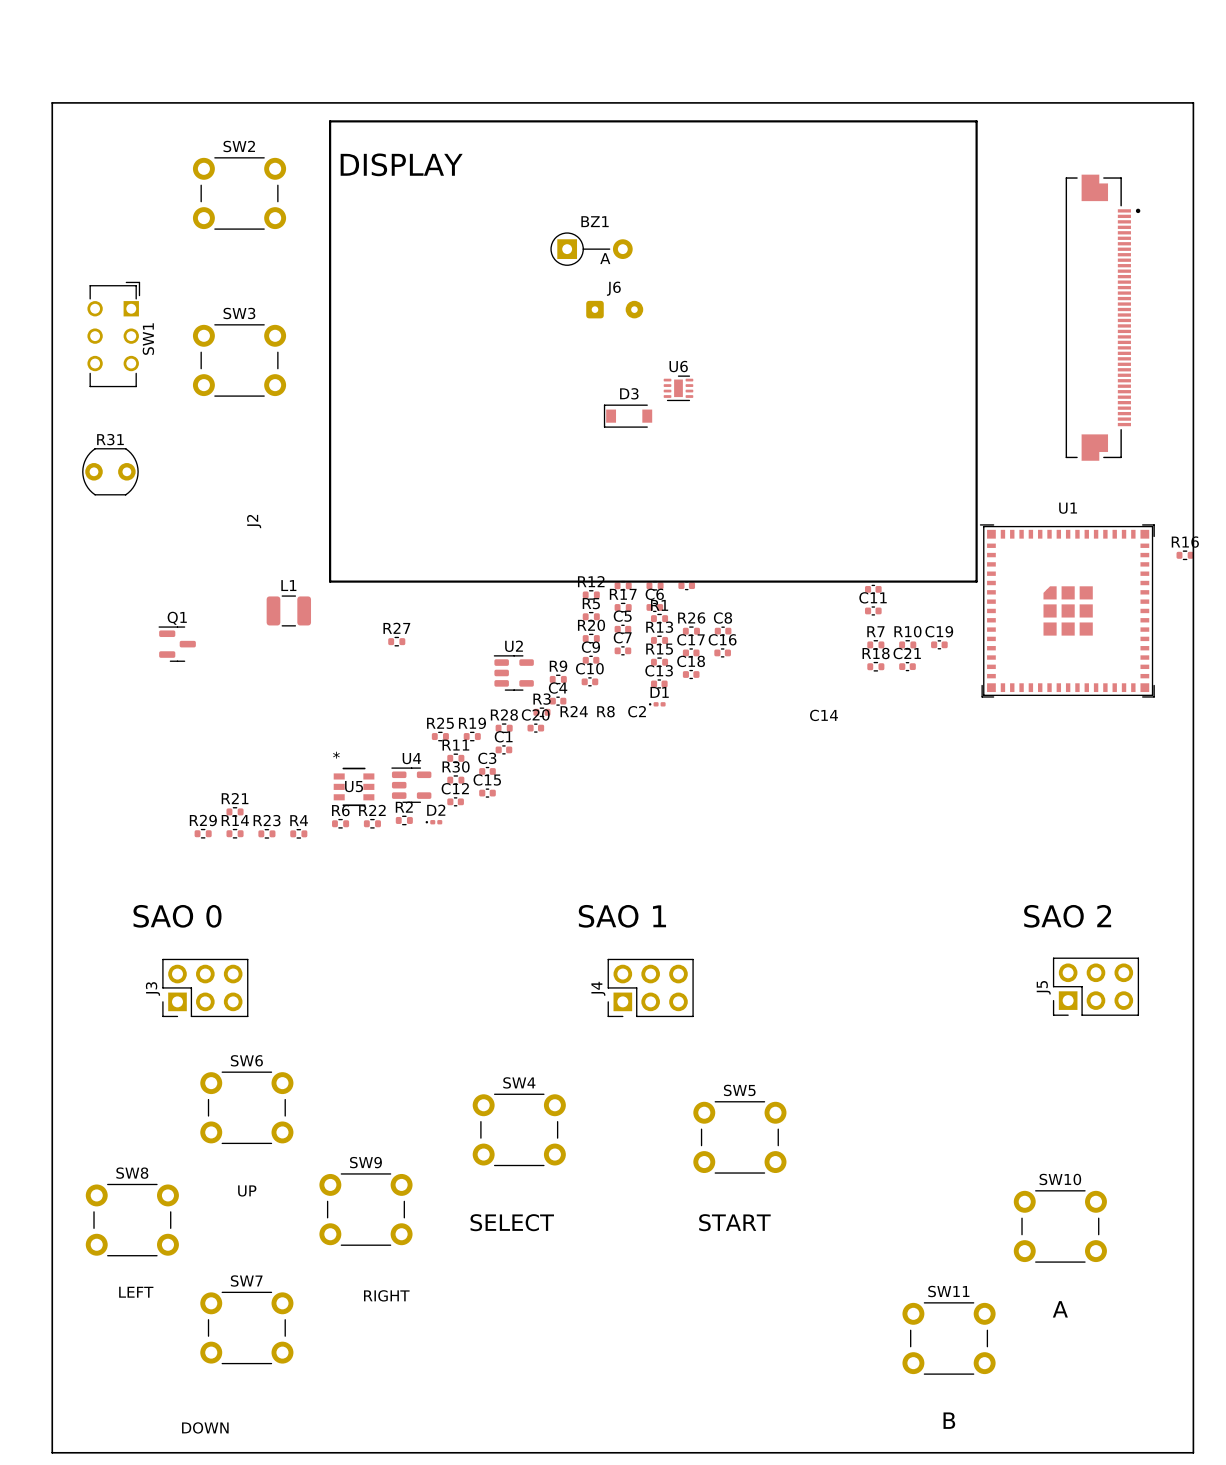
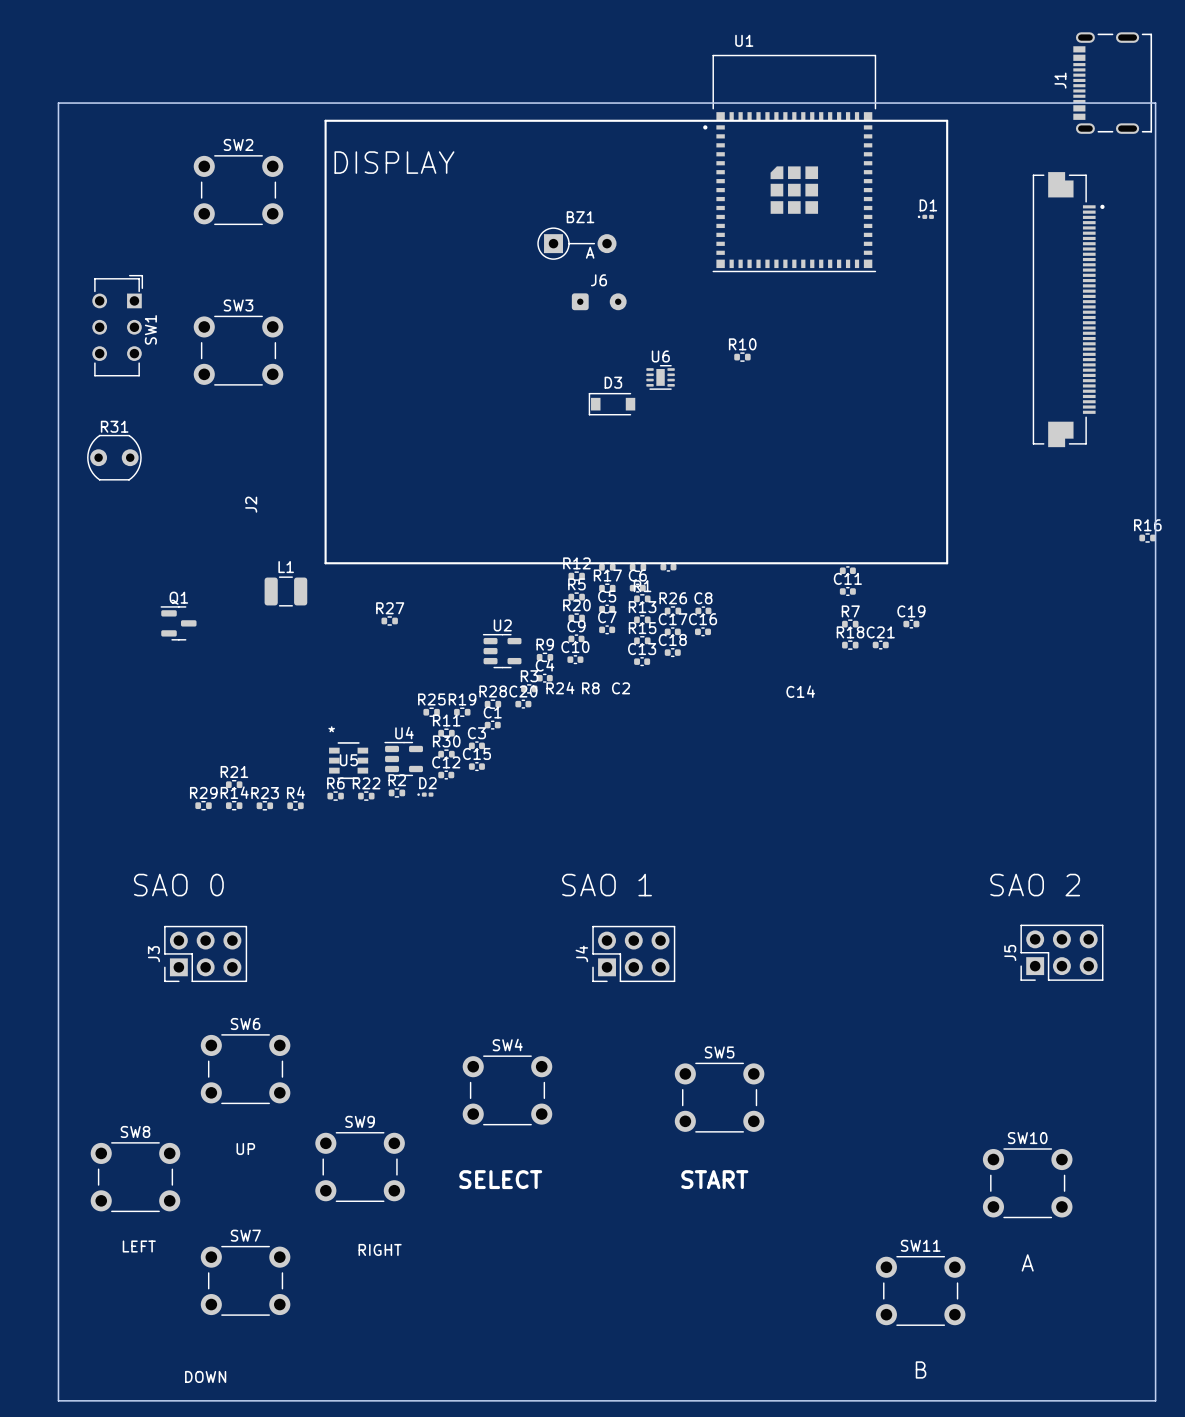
J1: none -> (1112, 83)
U1 name position: U1 (1068, 508) -> U1 (744, 40)
U1 footprint: [979, 524, 1155, 698] -> [703, 54, 877, 273]
R10 position: (907, 644) -> (742, 357)
D1 position: (657, 704) -> (925, 216)

